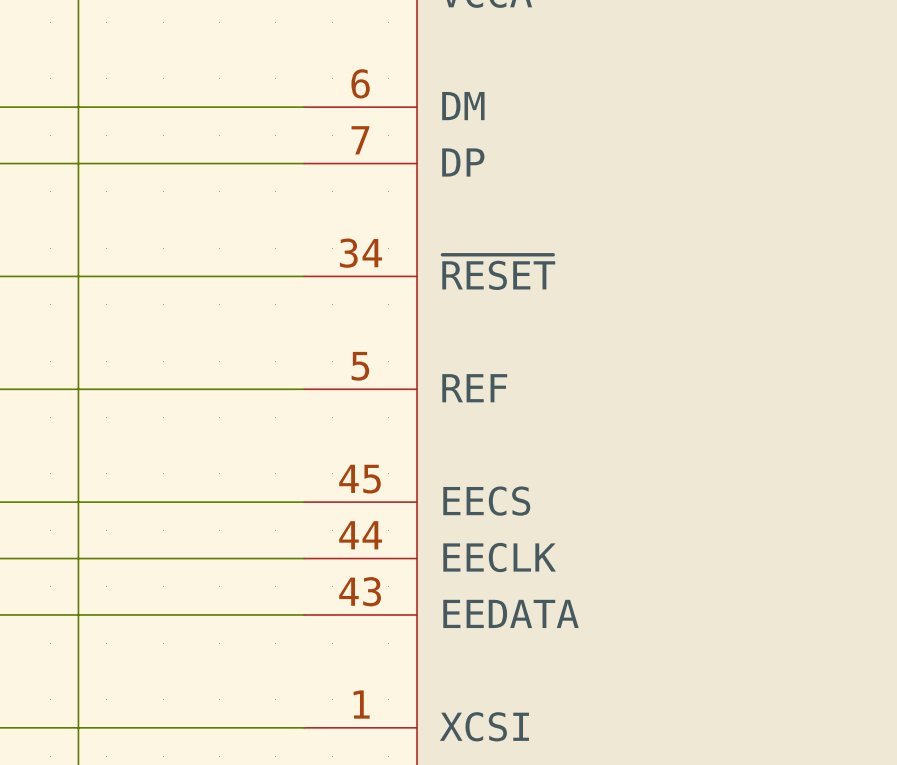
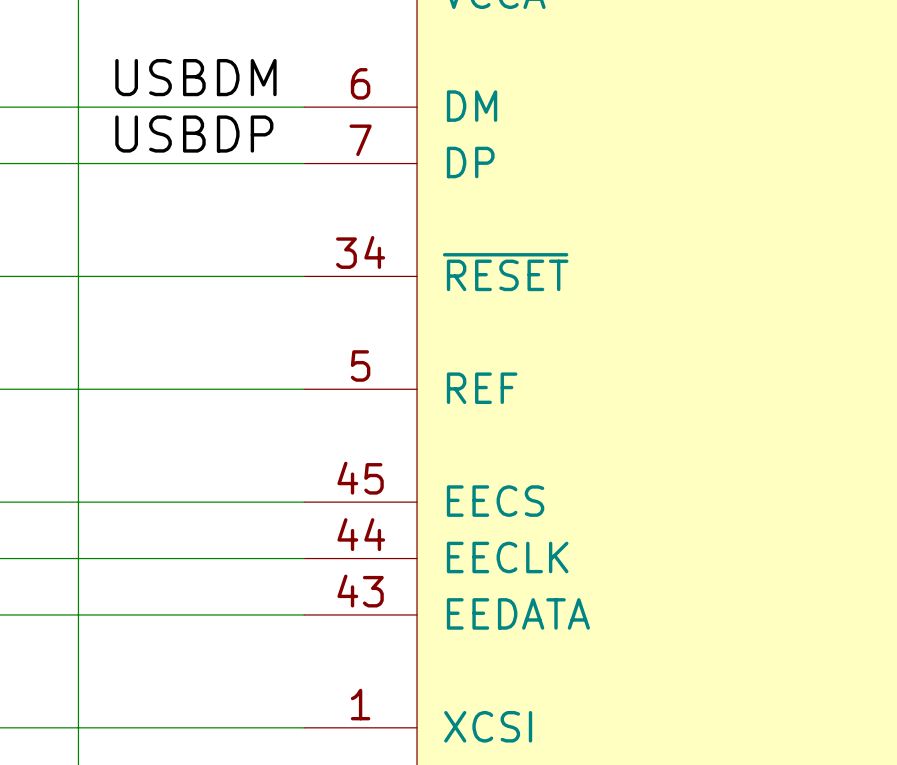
label: none -> USBDM (195, 77)
label: none -> USBDP (194, 134)

